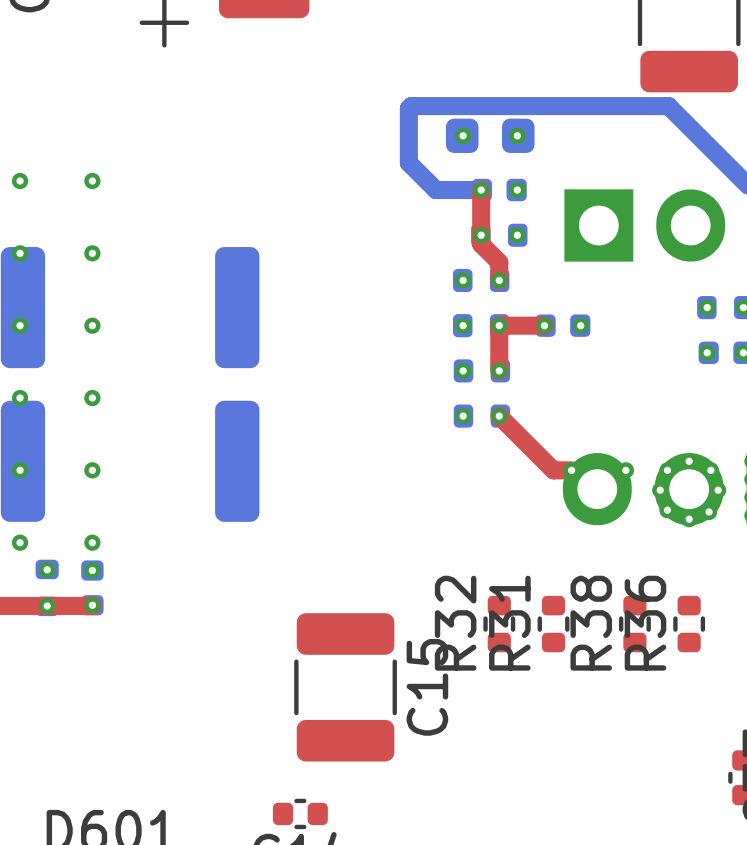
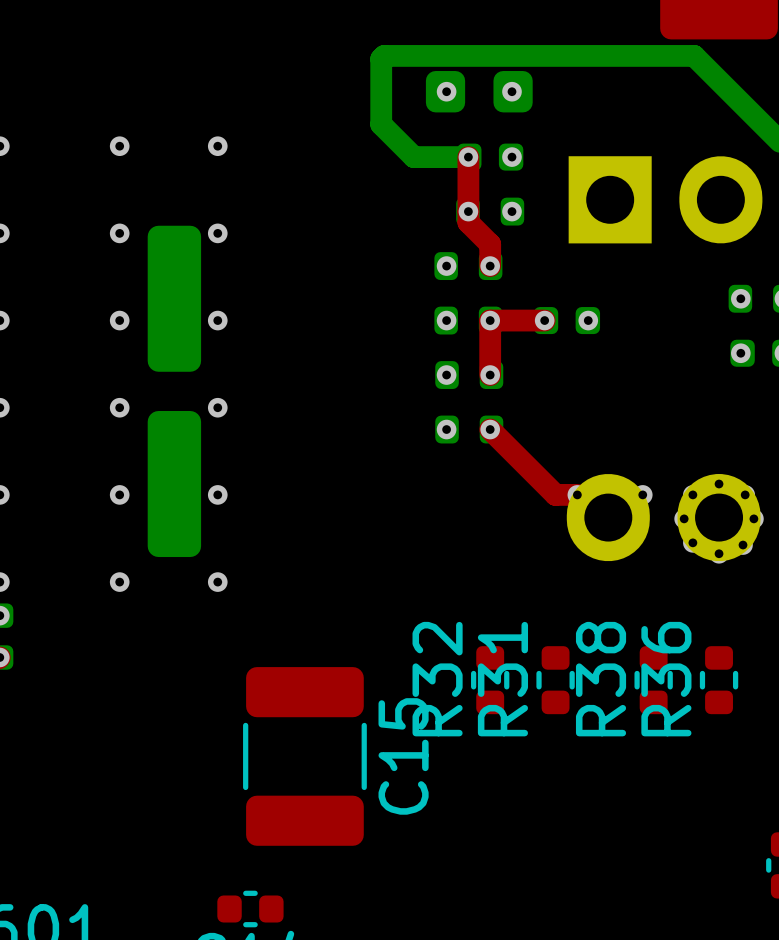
via: none -> (119, 146)
via: none -> (217, 146)
via: none -> (119, 233)
via: none -> (217, 233)
via: none -> (119, 320)
via: none -> (217, 320)
via: none -> (119, 407)
via: none -> (217, 407)
via: none -> (119, 494)
via: none -> (217, 494)
via: none -> (119, 582)
via: none -> (217, 582)

